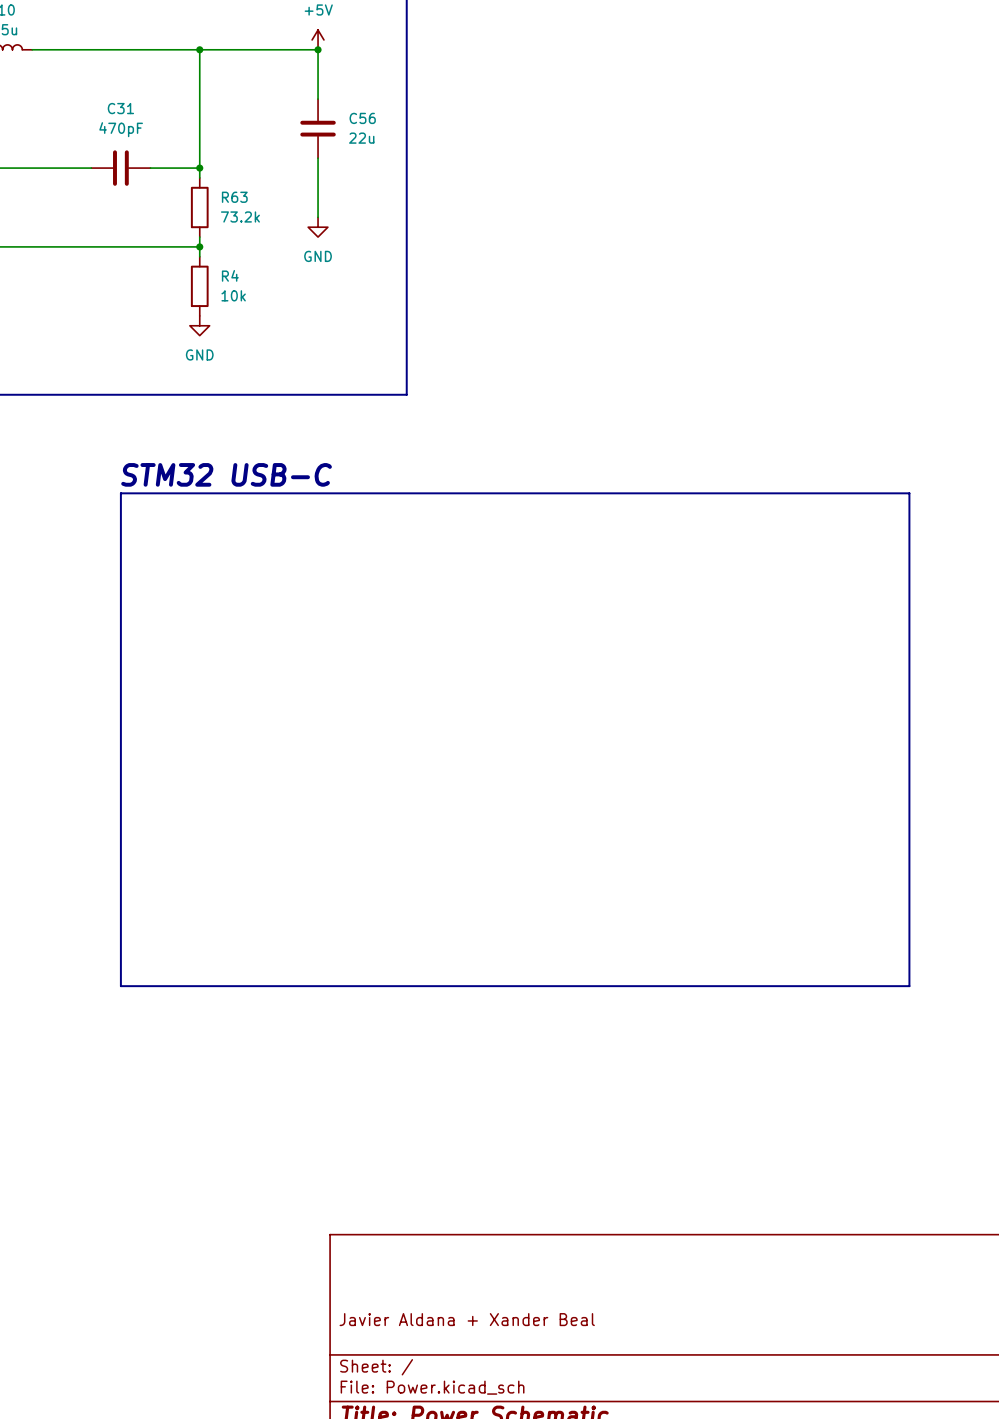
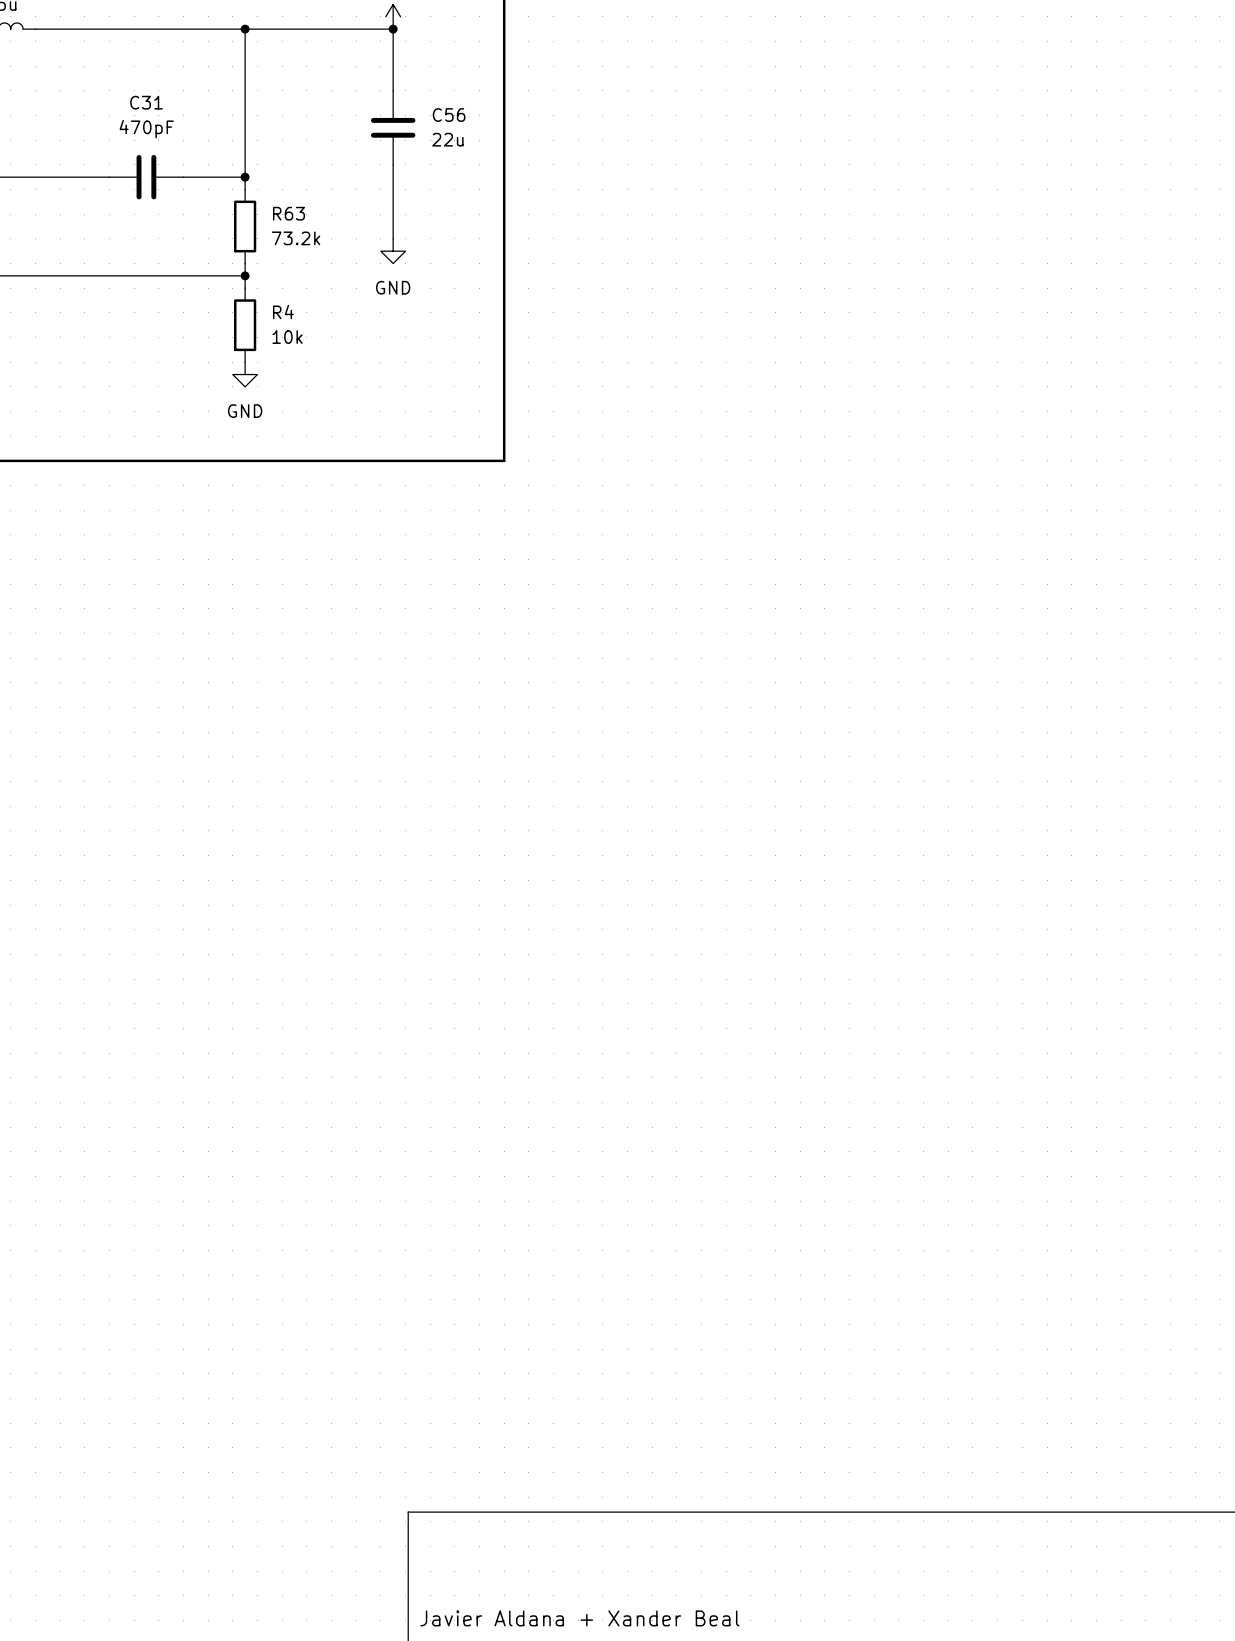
text: STM32 USB-C (226, 474) -> none
line: (120, 493) (909, 493) (909, 986) (120, 986) (120, 493) -> none

